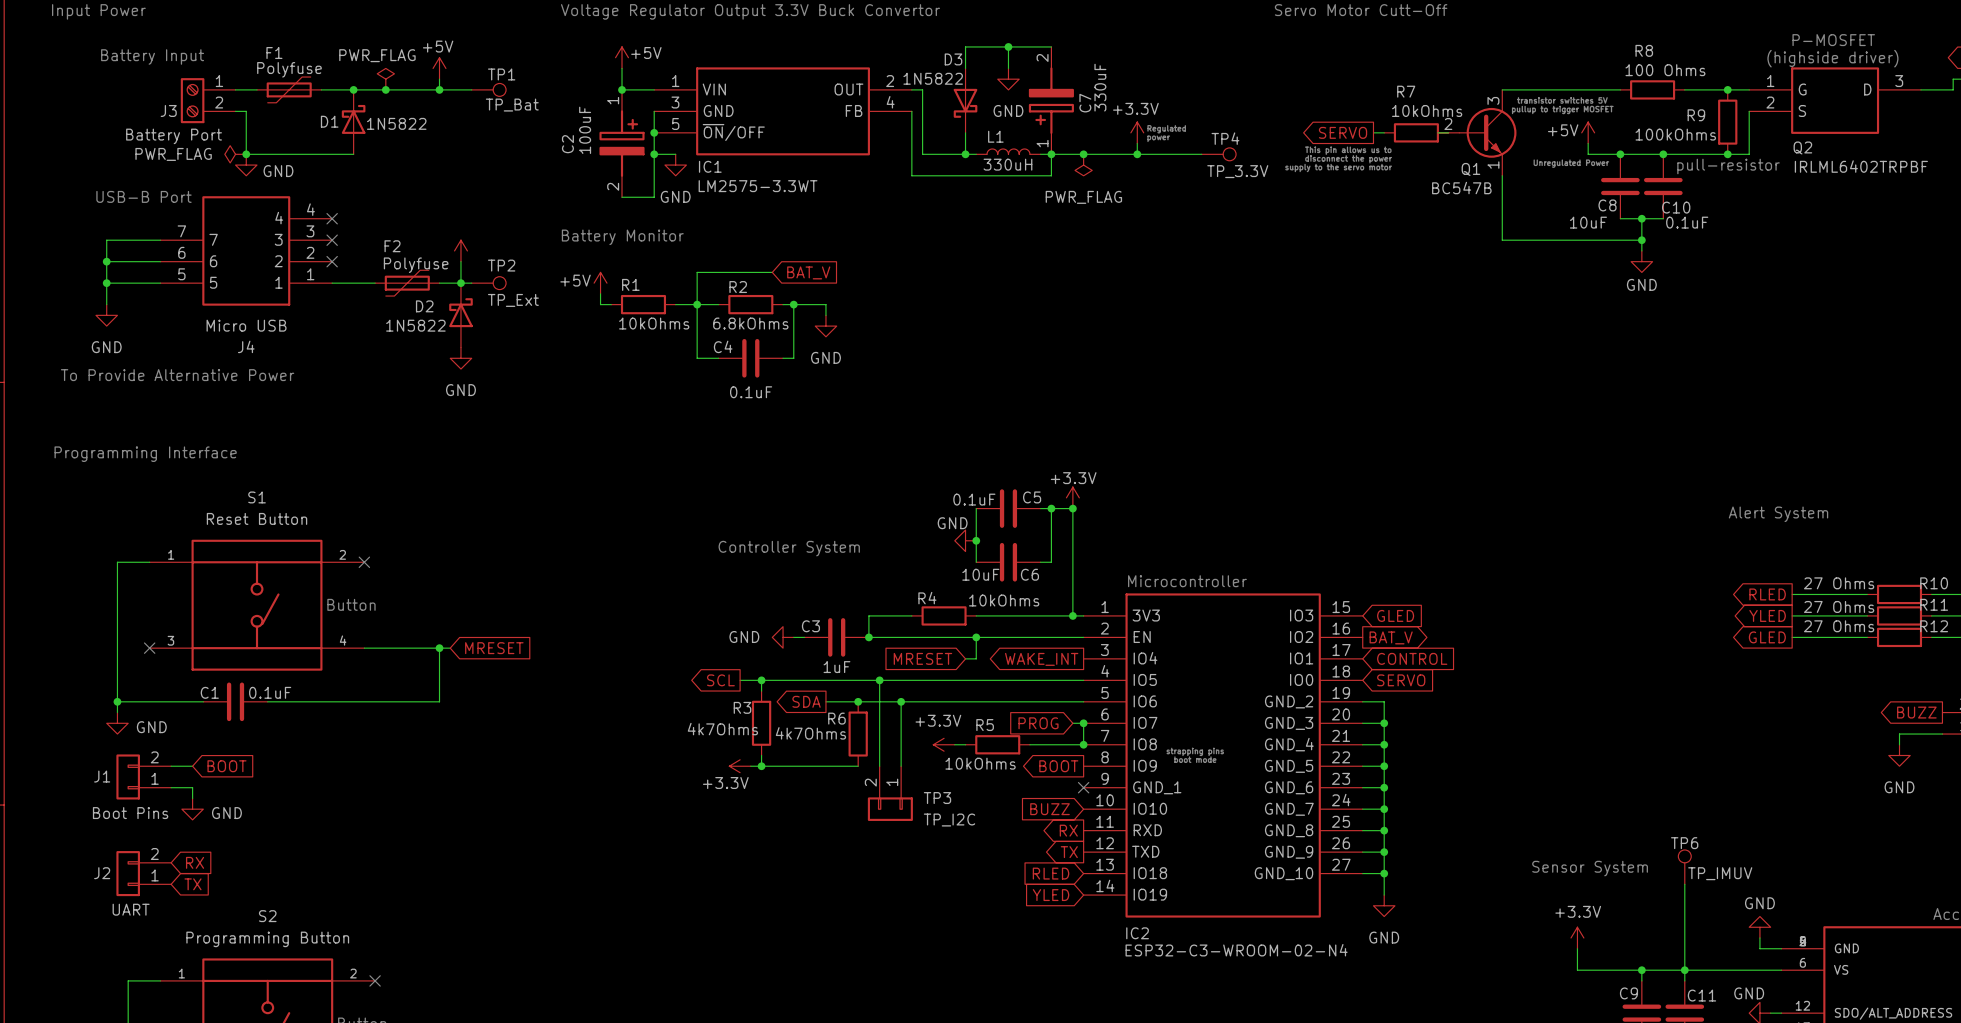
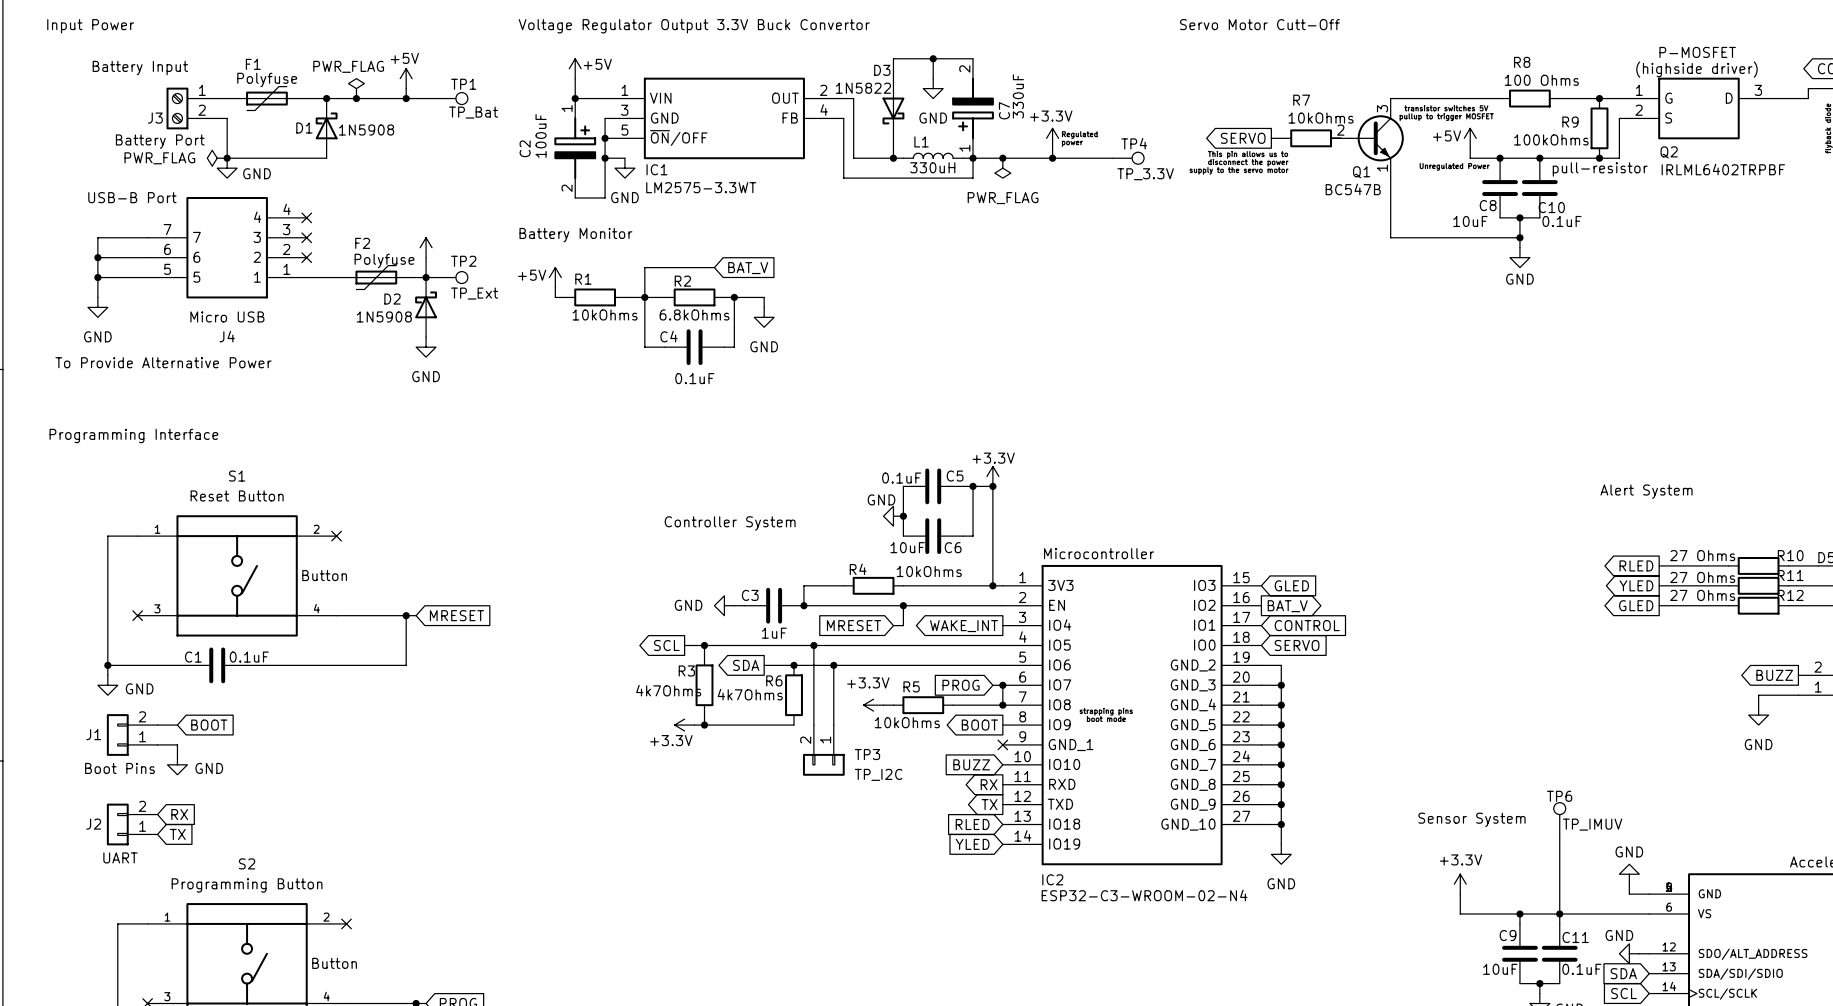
D1 value: 1N5822 (396, 123) -> 1N5908 (366, 130)
D2 value: 1N5822 (415, 325) -> 1N5908 (384, 316)

